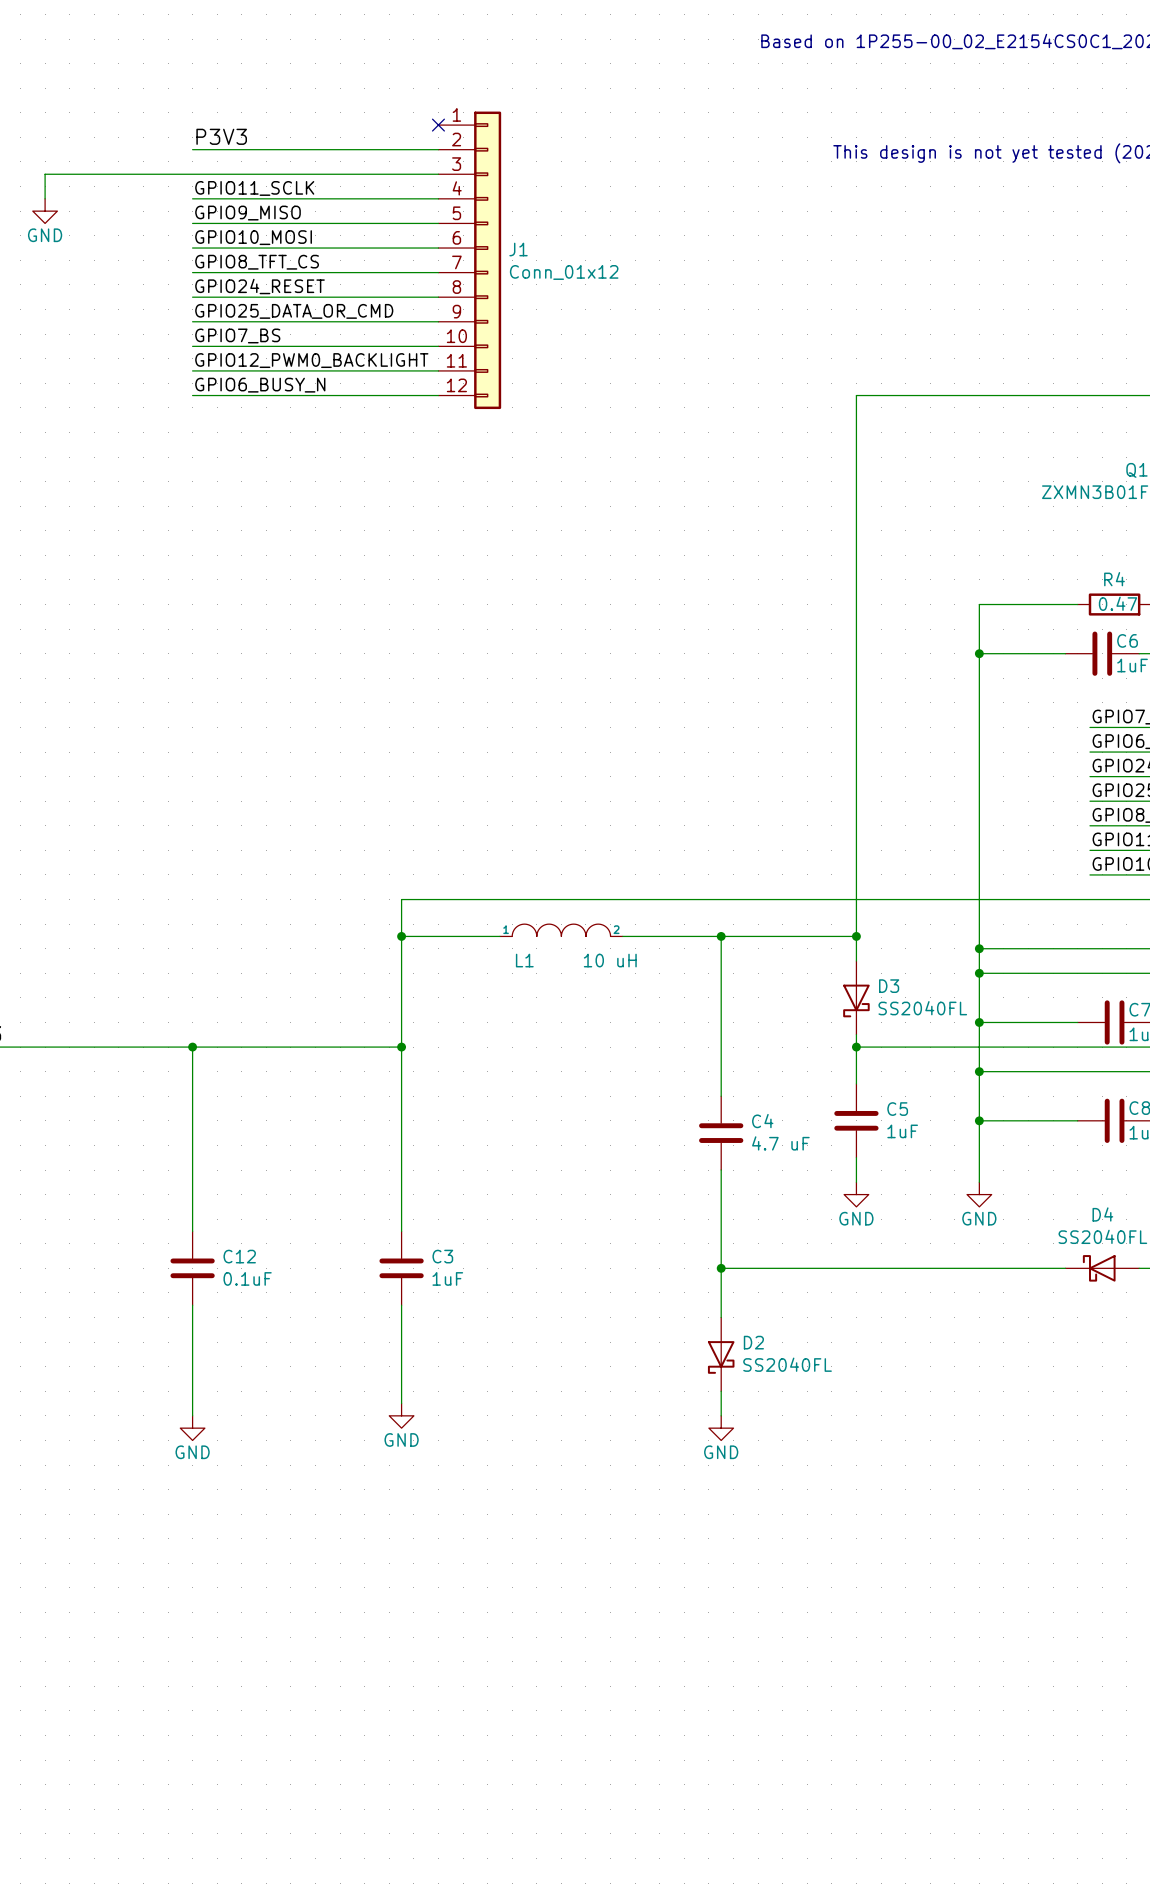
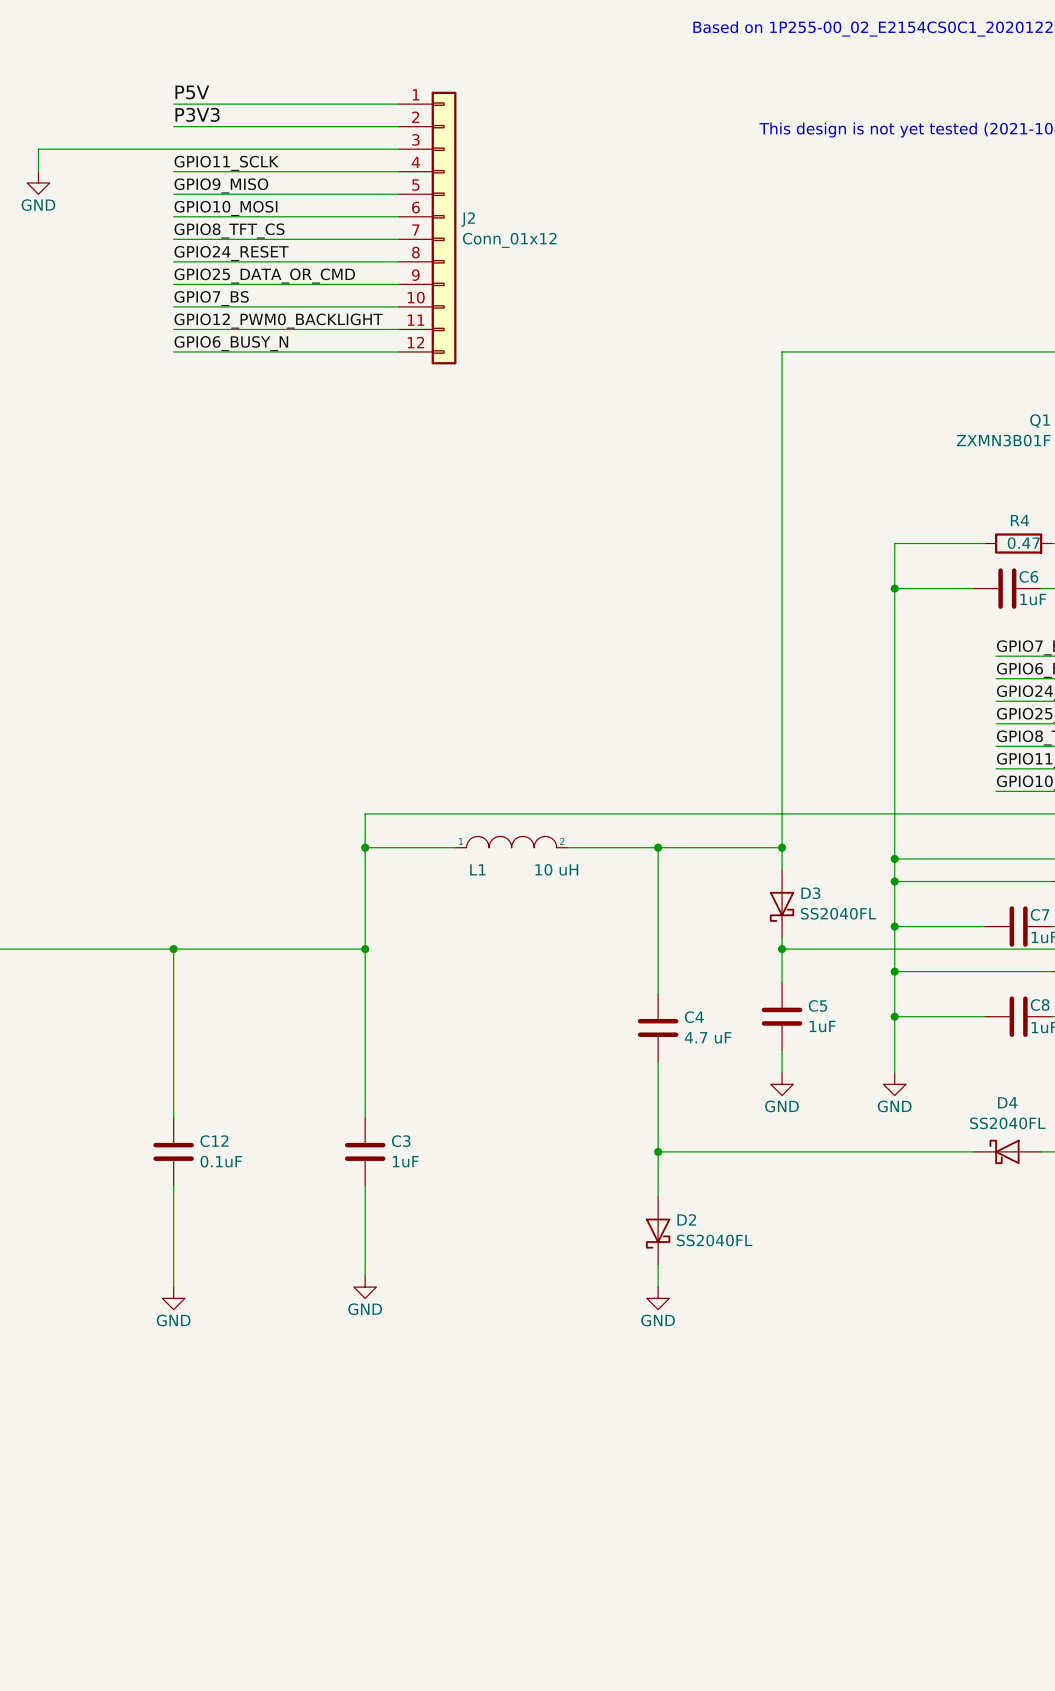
label: none -> P5V (192, 92)
wire: none -> (173, 104) (398, 104)
no-connect mark: (438, 125) -> none
J1 name: J1 (518, 249) -> J2 (468, 219)

